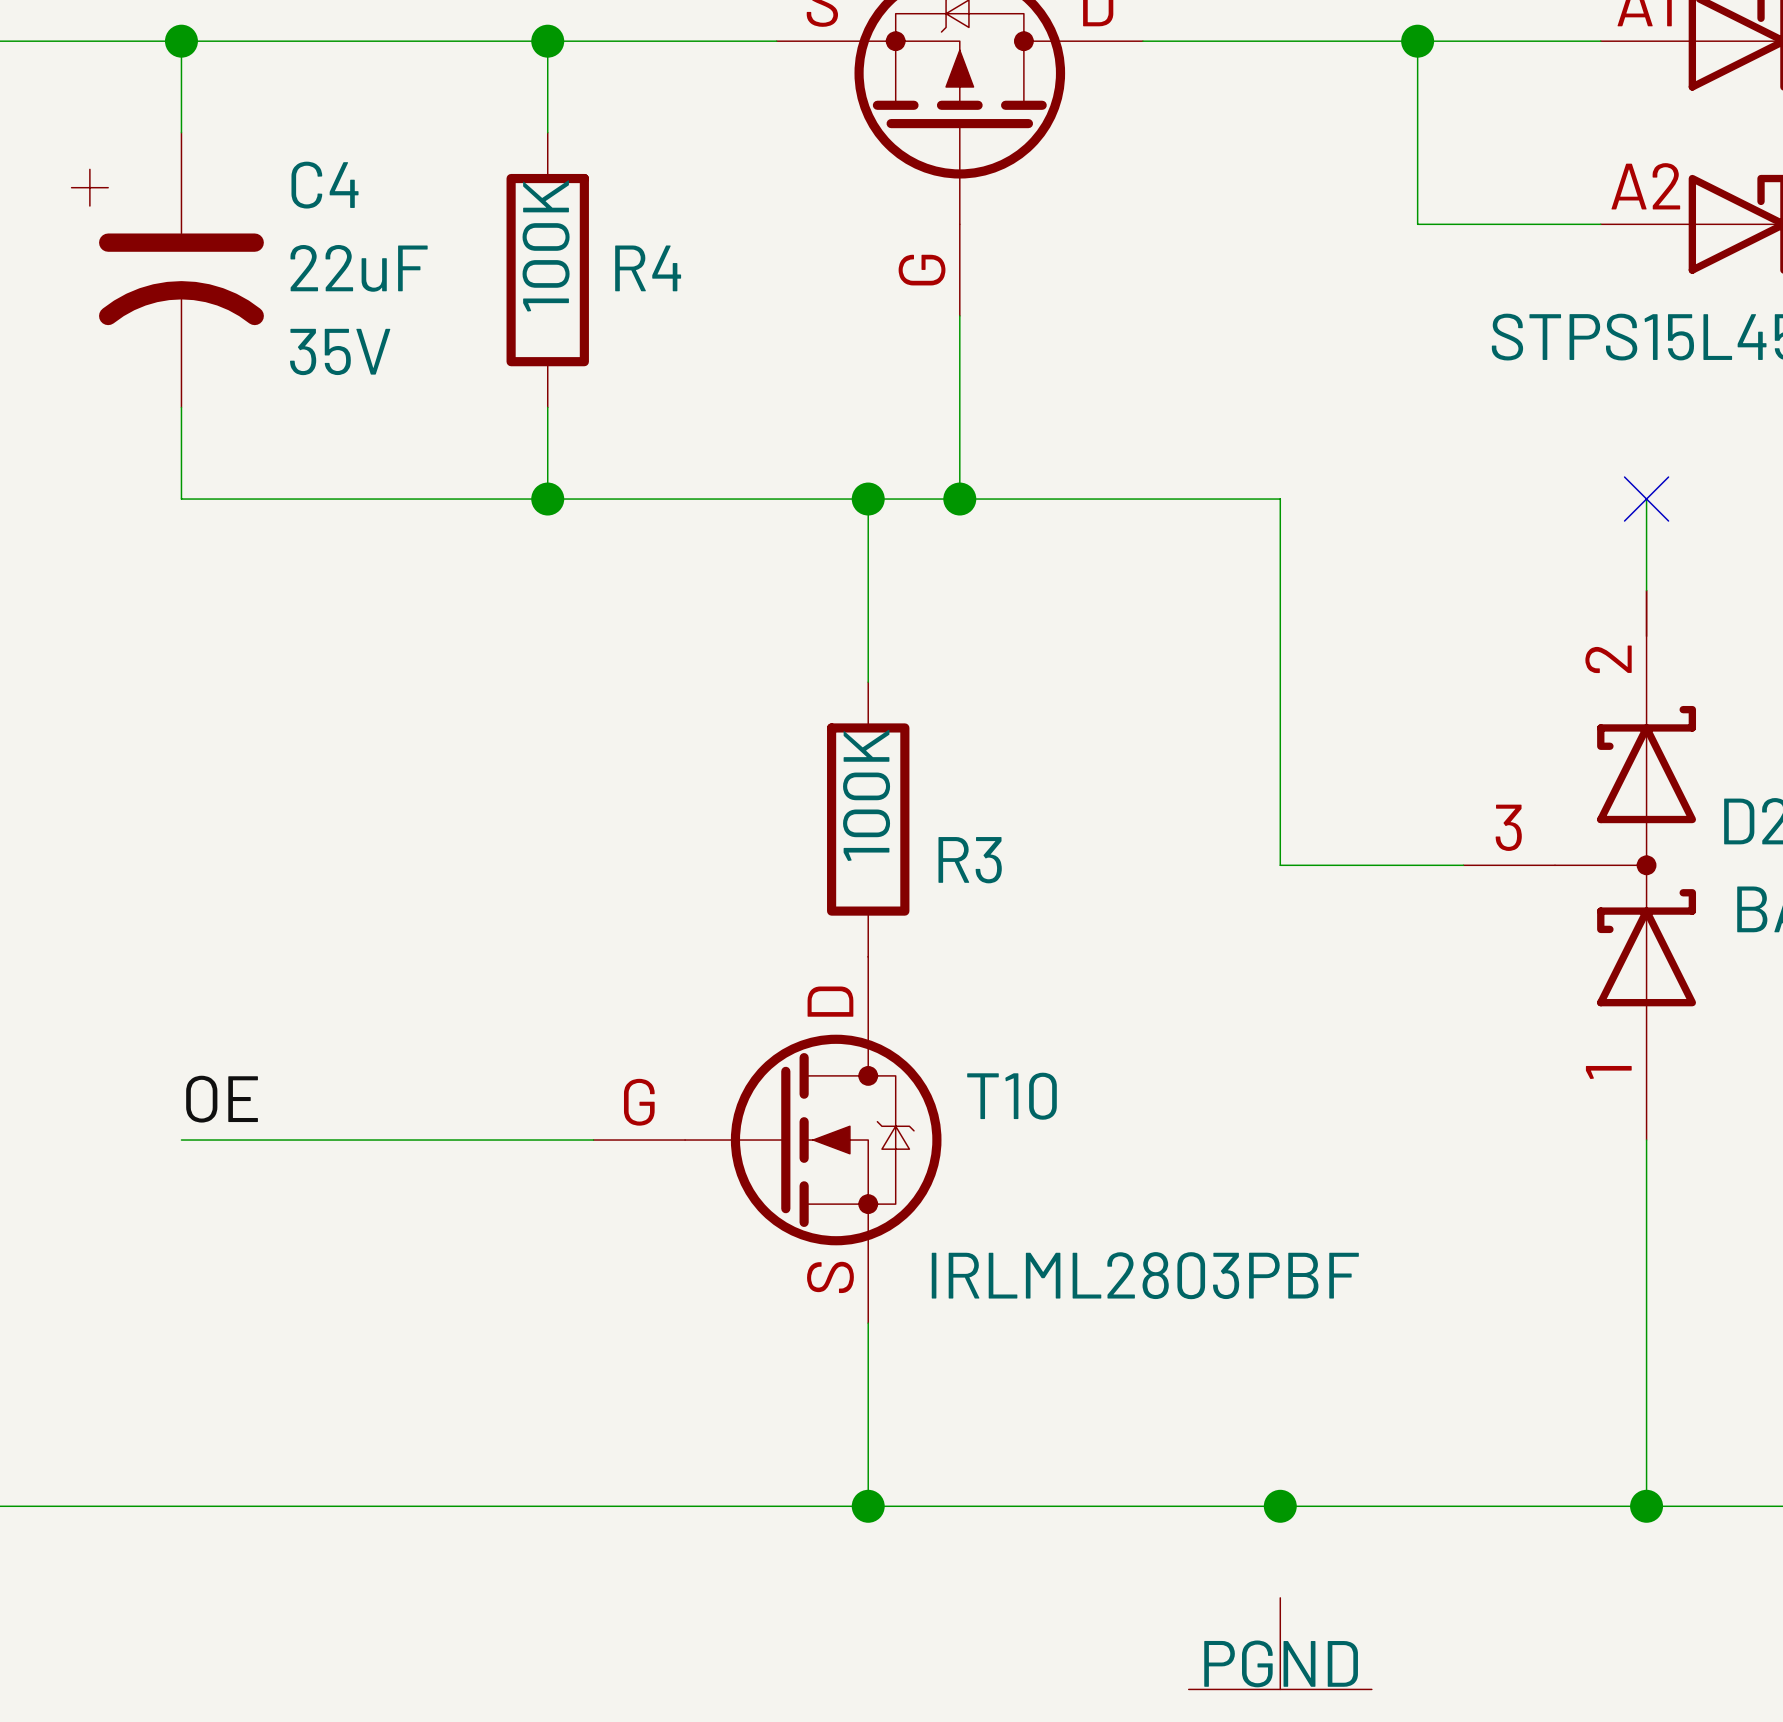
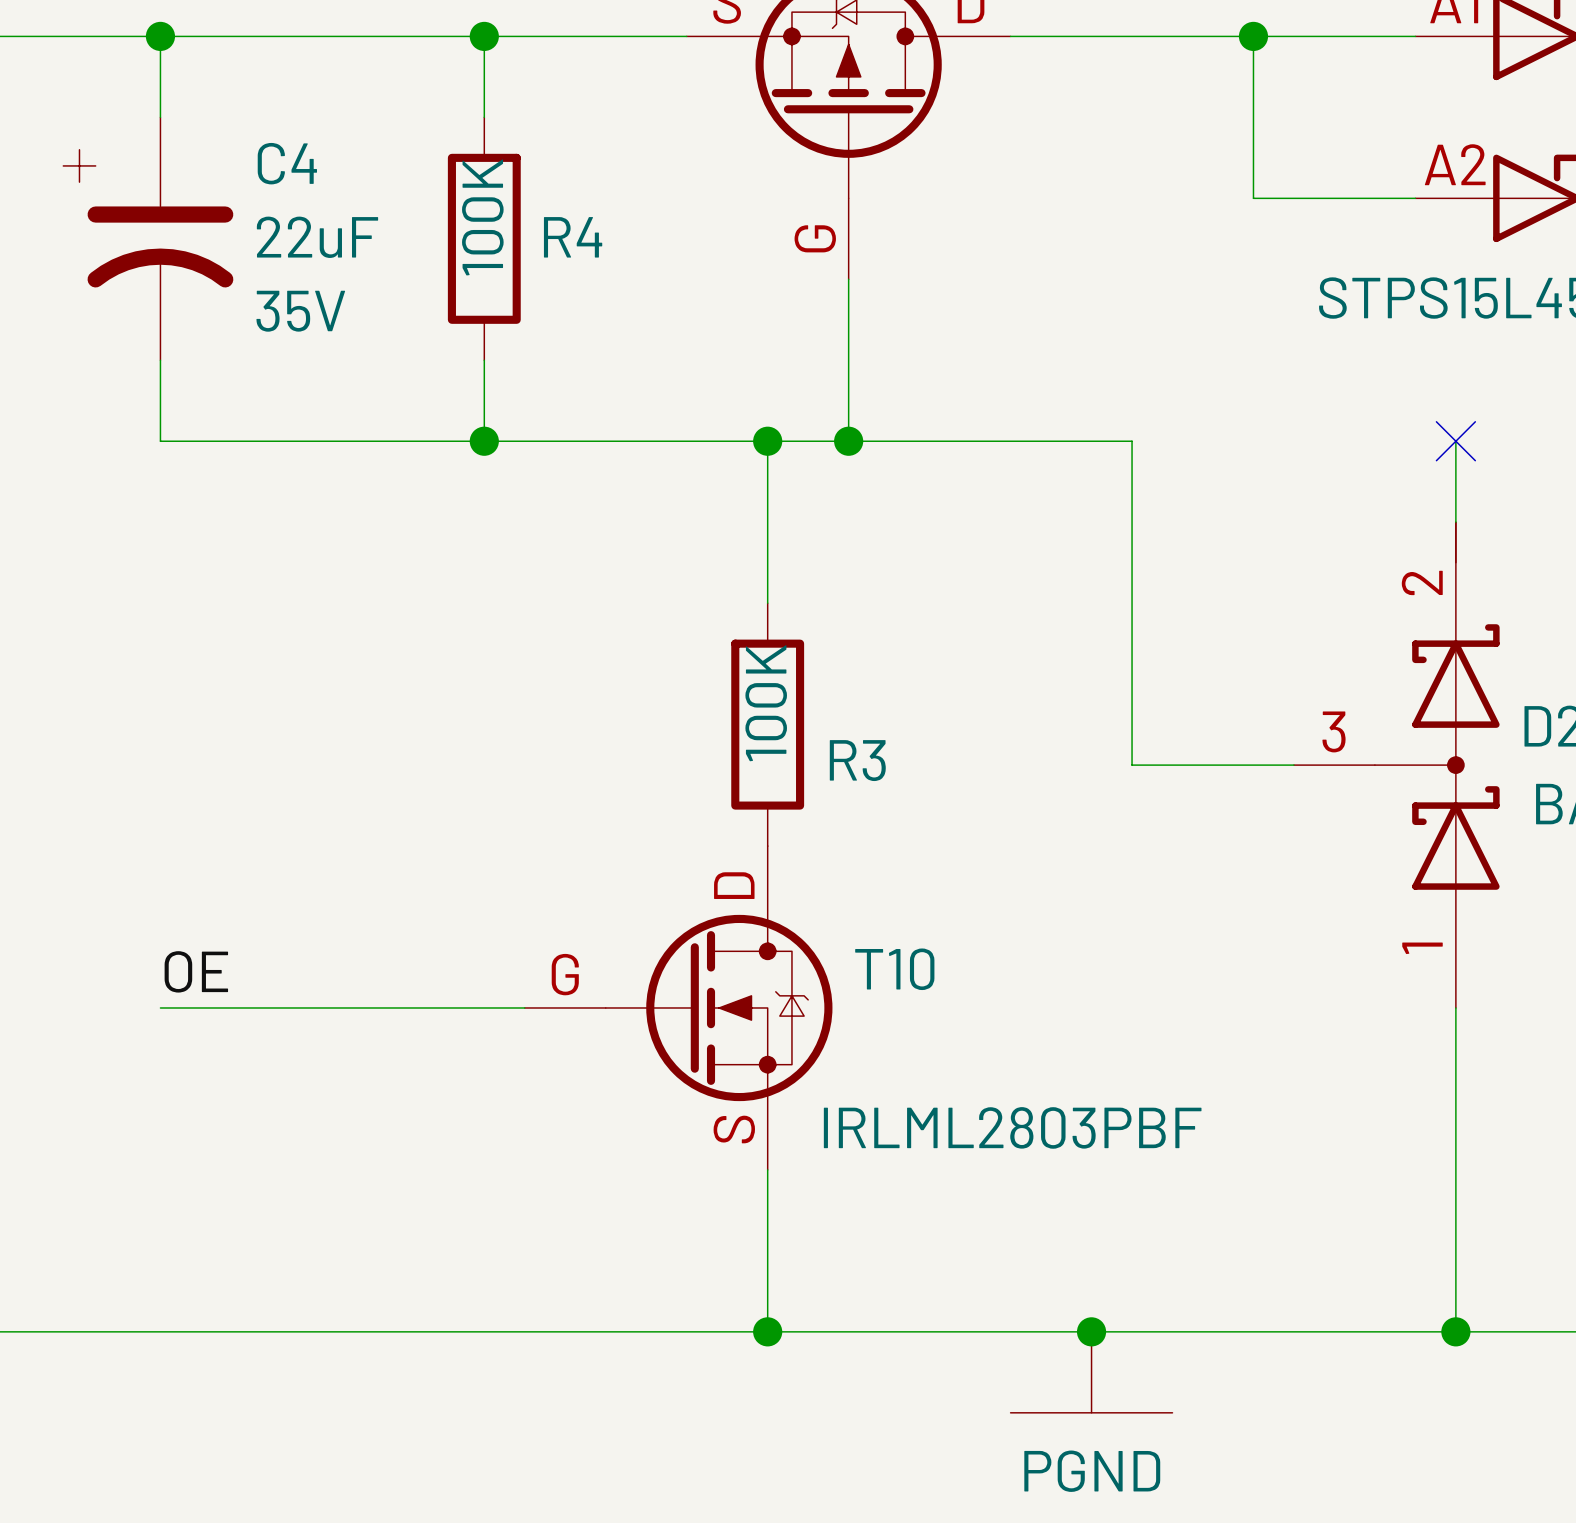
junction position: (1280, 1506) -> (1091, 1331)
power symbol position: PGND (1280, 1643) -> PGND (1091, 1372)
power symbol text position: PGND (1281, 1663) -> PGND (1092, 1471)

